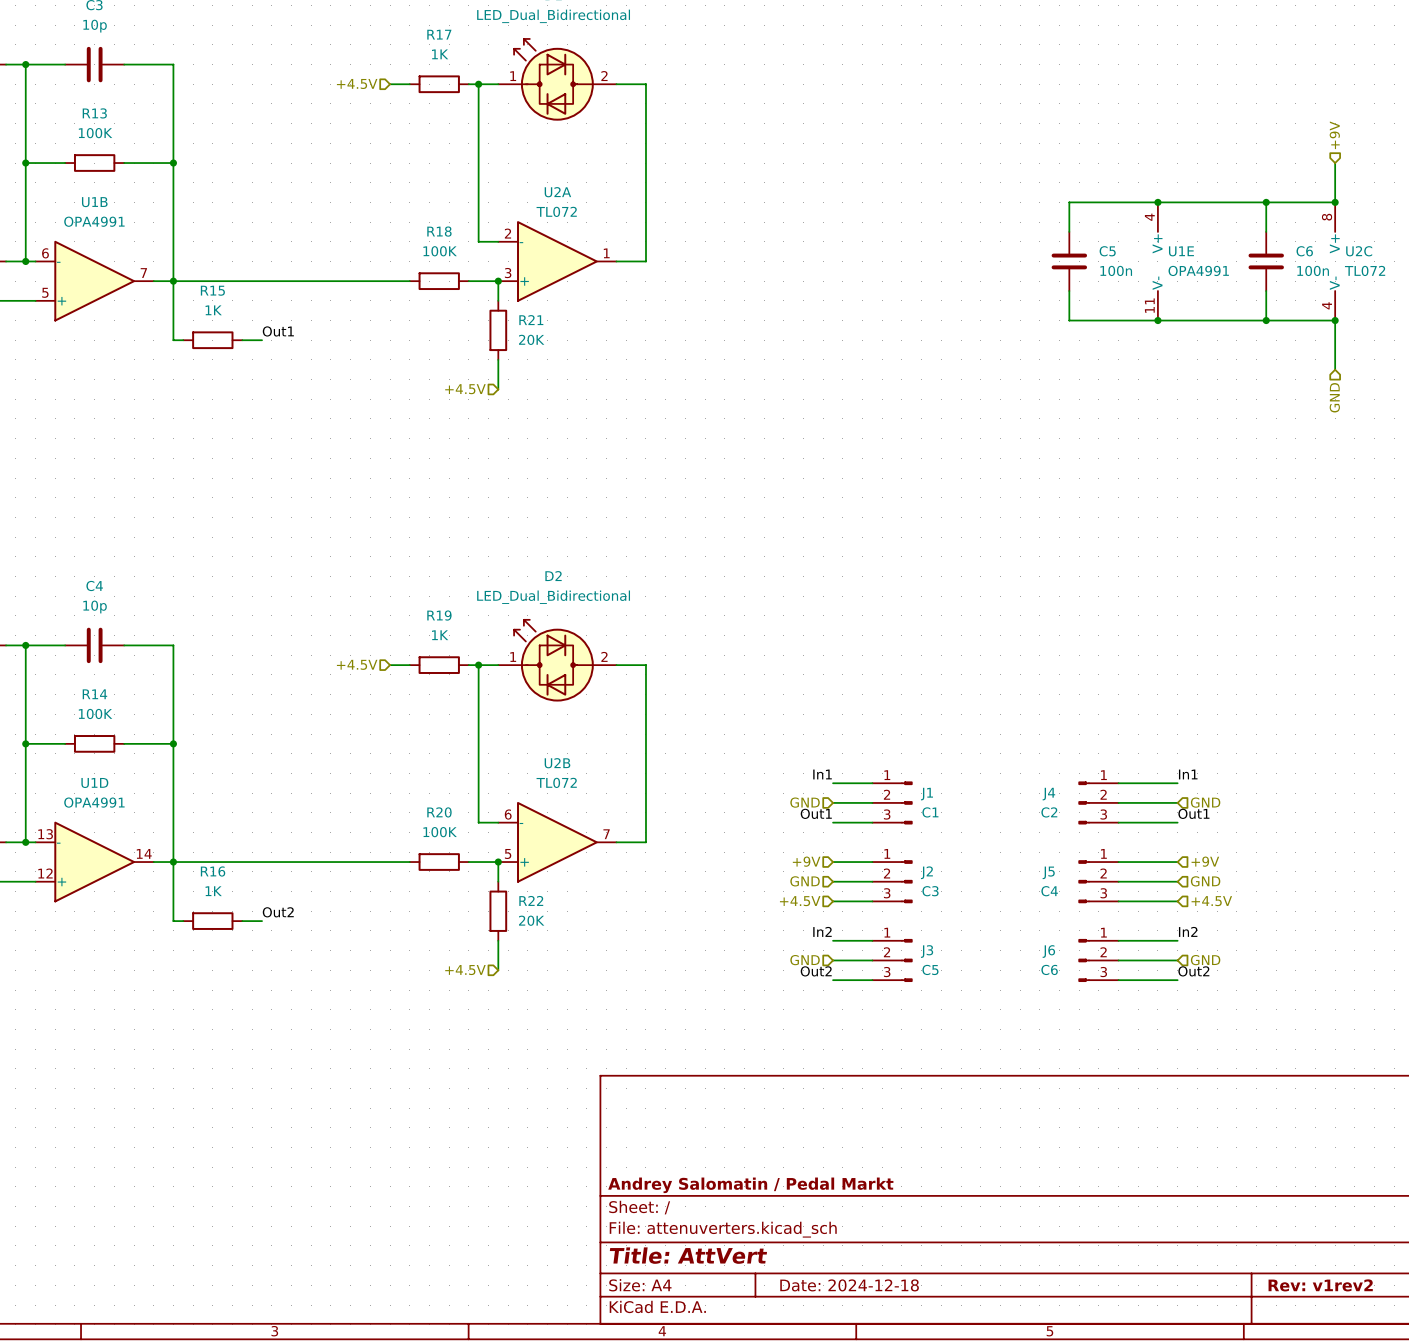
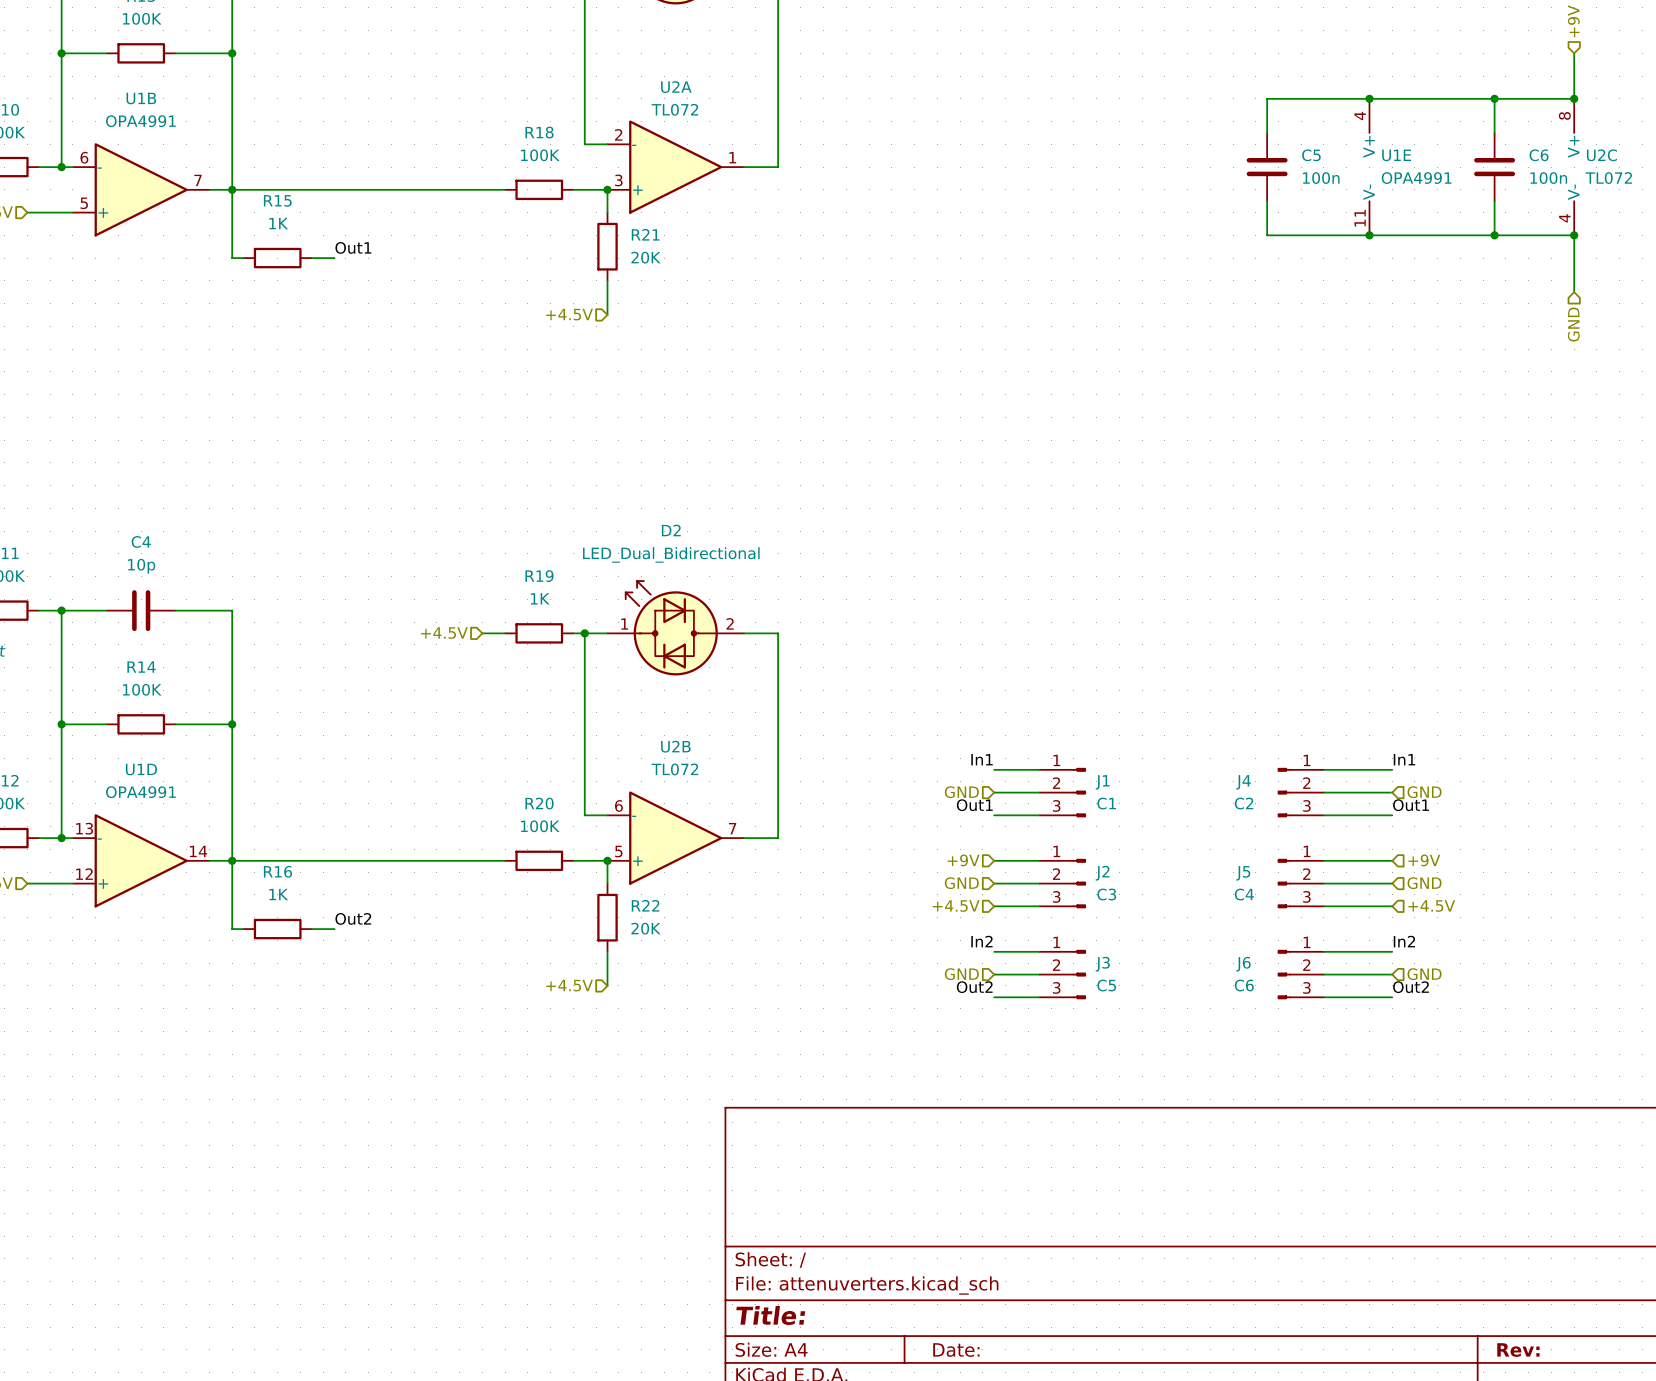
title block: Andrey Salomatin / Pedal Markt (750, 1185) -> none
title block: Title: AttVert (688, 1255) -> Title: (770, 1315)
title block: Date: 2024-12-18 (849, 1285) -> Date: (956, 1350)
title block: Rev: v1rev2 (1320, 1285) -> Rev: (1518, 1350)

